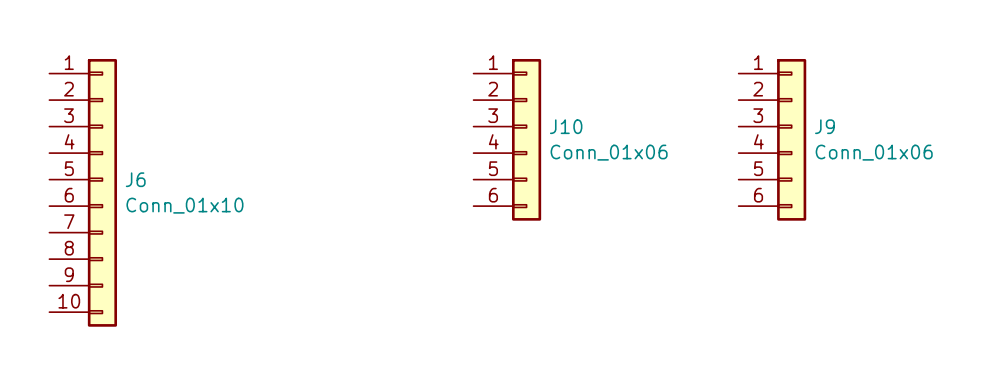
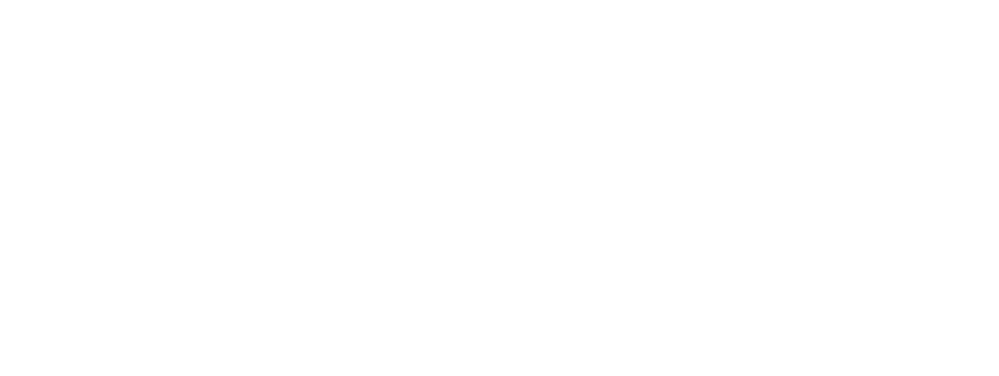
J10: Conn_01x06 (507, 139) -> none
J9: Conn_01x06 (772, 139) -> none
J6: Conn_01x10 (83, 192) -> none

